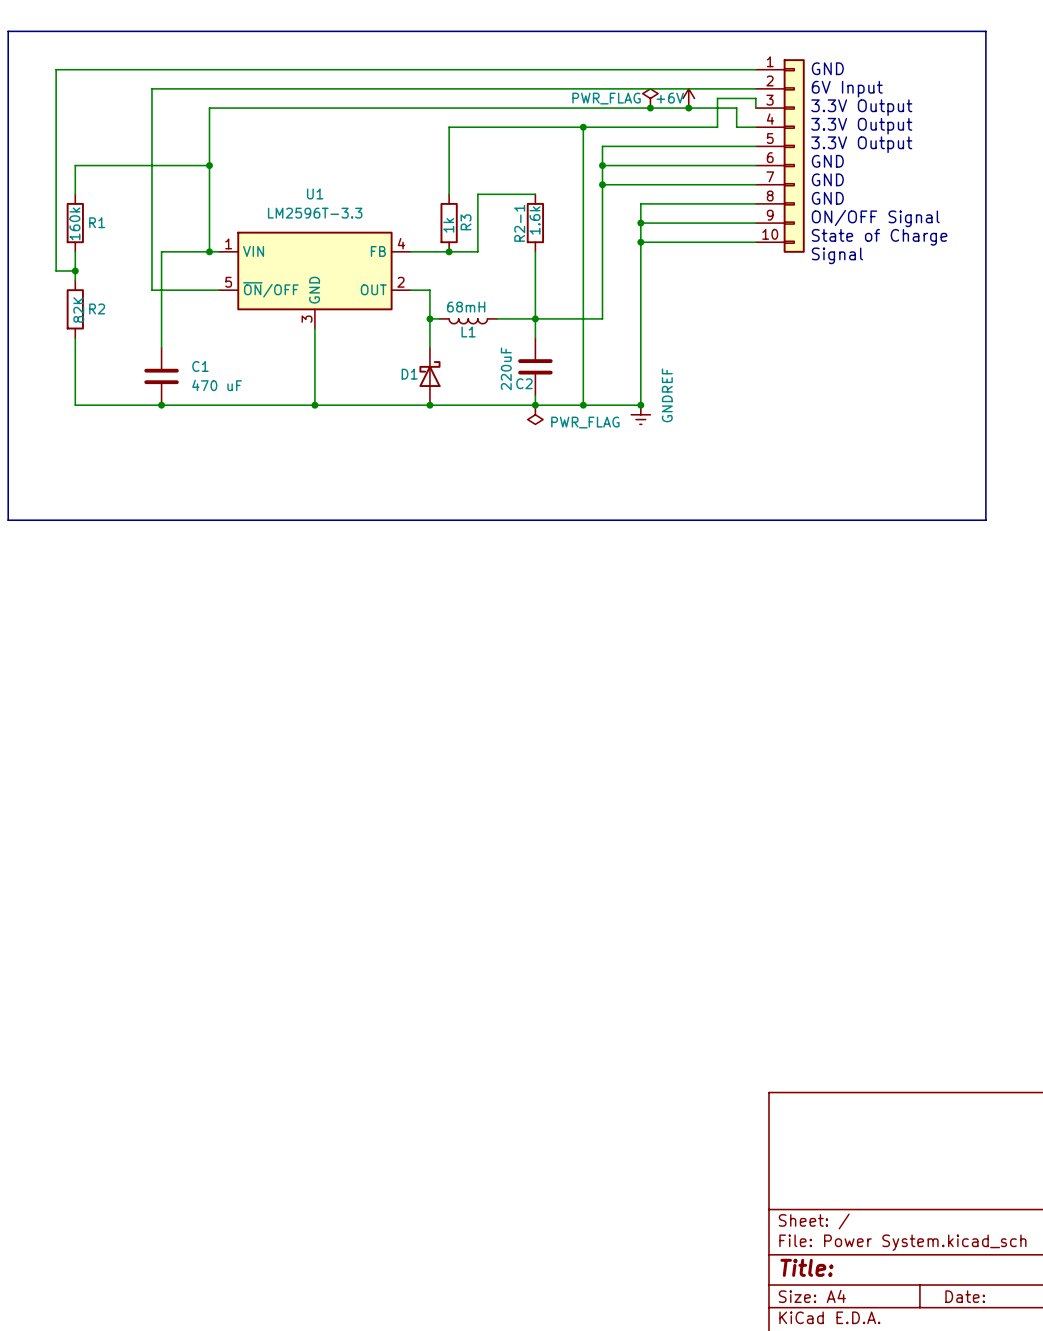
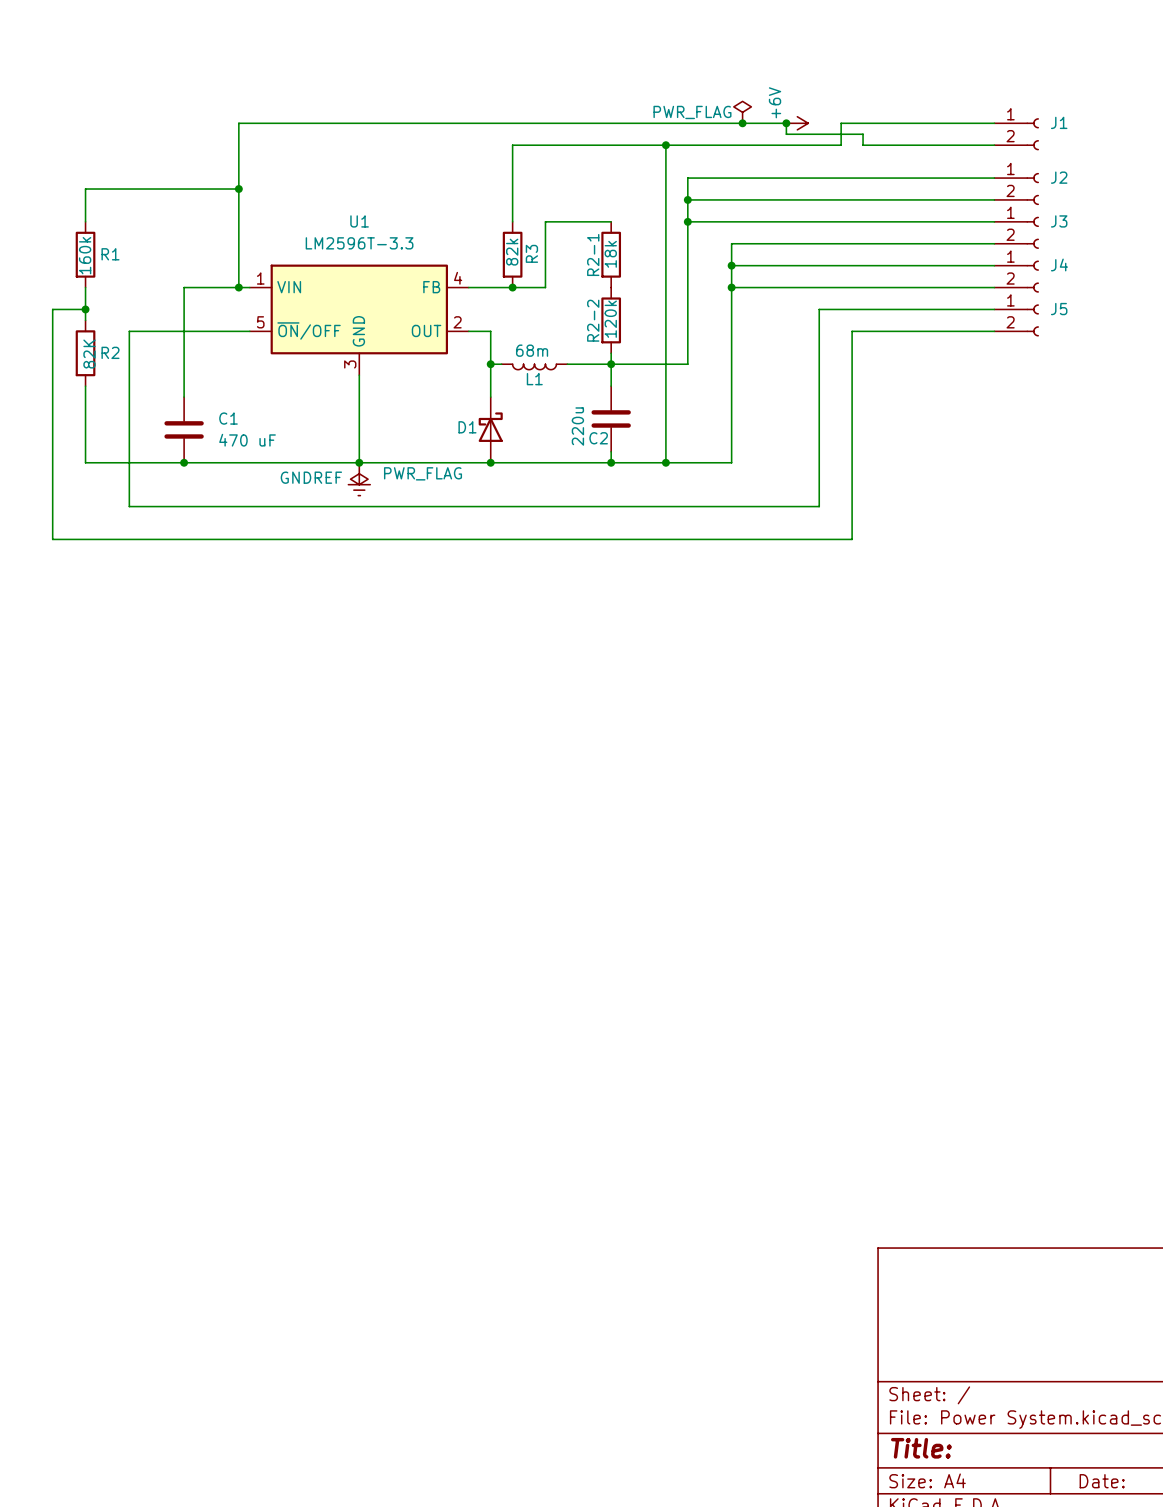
line: (8, 31) (985, 31) (985, 520) (8, 520) (8, 31) -> none
text: GND (827, 68) -> none
wire: (755, 69) (56, 69) (56, 271) -> (994, 331) (852, 331) (852, 539) (52, 539) (52, 309) (63, 309)
wire: (755, 88) (151, 88) (151, 290) -> (994, 309) (819, 309) (819, 506) (129, 506) (129, 331) (173, 331)
text: 6V Input (847, 89) -> none
power symbol text position: +6V (670, 98) -> +6V (775, 102)
power symbol rotation: 0° (688, 98) -> 90° clockwise (797, 123)
power symbol position: +6V (688, 98) -> +6V (797, 123)
text: 3.3V Output (861, 107) -> none
wire: (688, 108) (736, 108) -> (786, 123) (786, 134) (863, 134) (863, 145) (994, 145)
wire: none -> (841, 123) (994, 123)
wire: (755, 108) (755, 98) (717, 98) (717, 127) -> (841, 145) (819, 145)
J1: none -> (1016, 134)
text: 3.3V Output (861, 126) -> none
wire: (736, 127) (755, 127) -> none
text: 3.3V Output (861, 144) -> none
wire: (755, 146) (602, 146) (602, 155) -> (994, 178) (687, 178)
part: (780, 155) -> none
text: GND (827, 161) -> none
wire: (602, 165) (755, 165) -> none
junction: (602, 165) -> none
J2: none -> (1016, 189)
wire: none -> (687, 199) (994, 199)
junction: none -> (687, 199)
text: GND (827, 179) -> none
wire: (602, 184) (755, 184) -> none
junction: (602, 184) -> none
wire: none -> (687, 221) (994, 221)
junction: none -> (687, 221)
text: GND (827, 198) -> none
wire: (755, 203) (640, 203) (640, 213) -> (994, 243) (731, 243)
J3: none -> (1016, 232)
text: ON/OFF Signal (875, 218) -> none
R2-1 value: 1.6k (535, 220) -> 18k (610, 254)
wire: (640, 223) (755, 223) -> none
junction: (640, 223) -> none
R3 value: 1k (448, 225) -> 82k (512, 252)
wire: none -> (731, 265) (994, 265)
junction: none -> (731, 265)
text: State of Charge (879, 237) -> none
wire: (640, 242) (755, 242) -> none
junction: (640, 242) -> none
J4: none -> (1016, 276)
wire: none -> (731, 287) (994, 287)
junction: none -> (731, 287)
text: Signal (837, 255) -> none
R2-2: none -> 120k (611, 320)
J5: none -> (1016, 320)
L1 value: 68mH (466, 307) -> 68m (532, 350)
C2 value: 220uF (506, 368) -> 220u (577, 426)
junction: (640, 405) -> none
power symbol: none -> PWR_FLAG (359, 473)
power symbol: PWR_FLAG (535, 414) -> none
power symbol: GNDREF (640, 414) -> none
power symbol: none -> GNDREF (359, 484)

